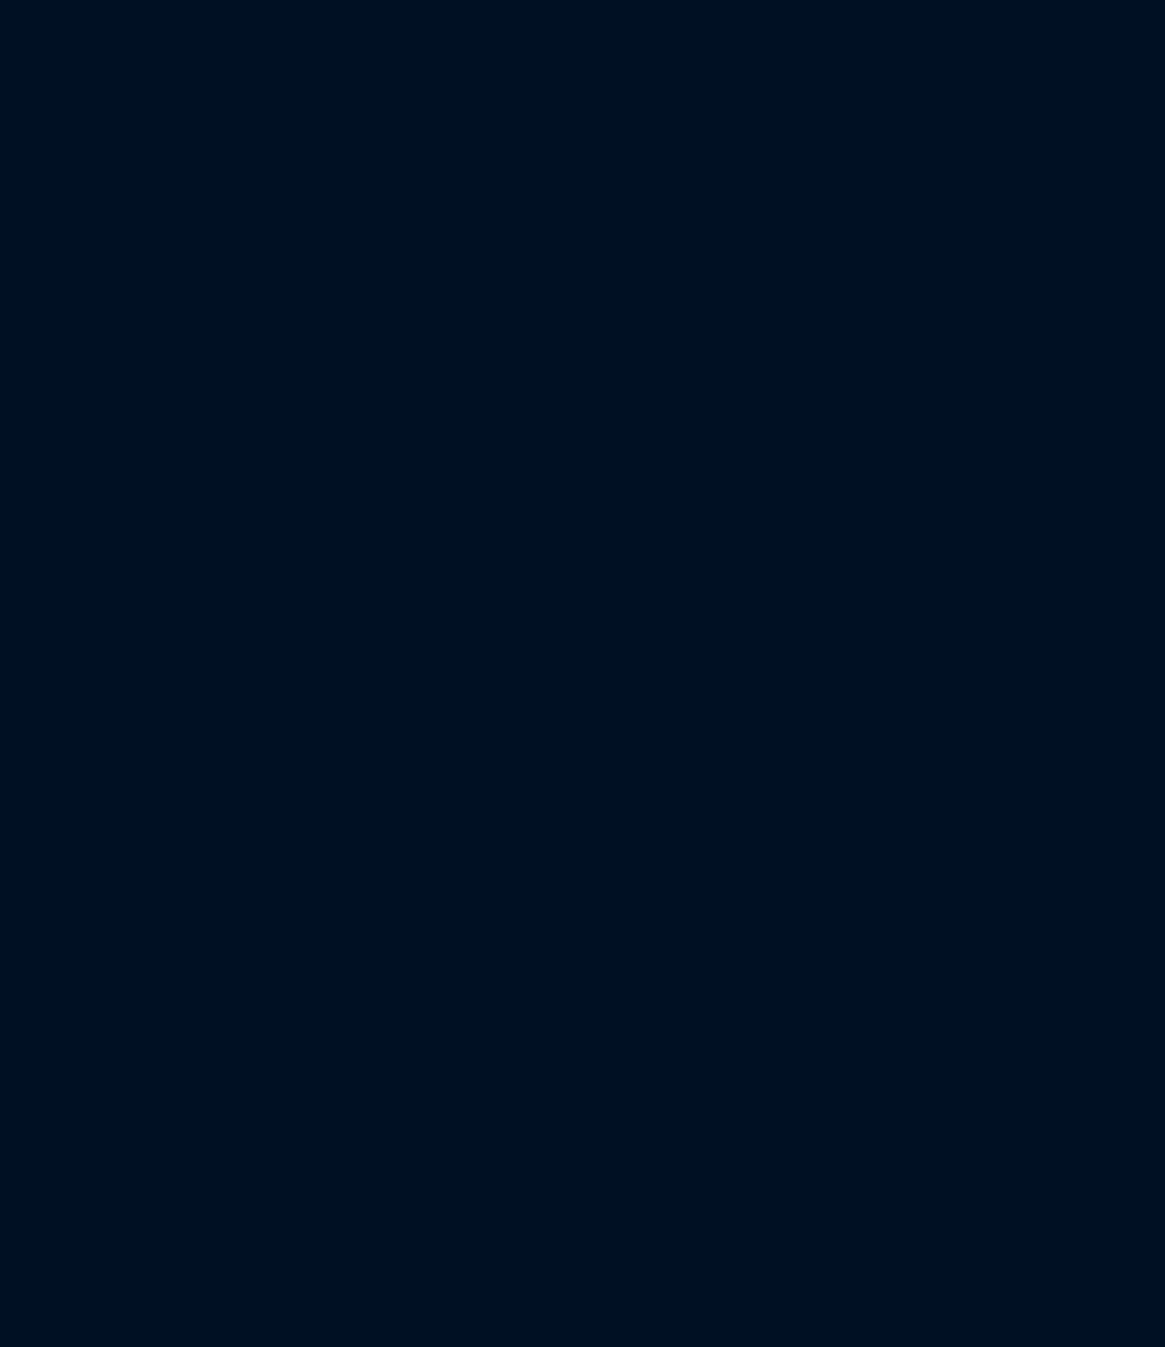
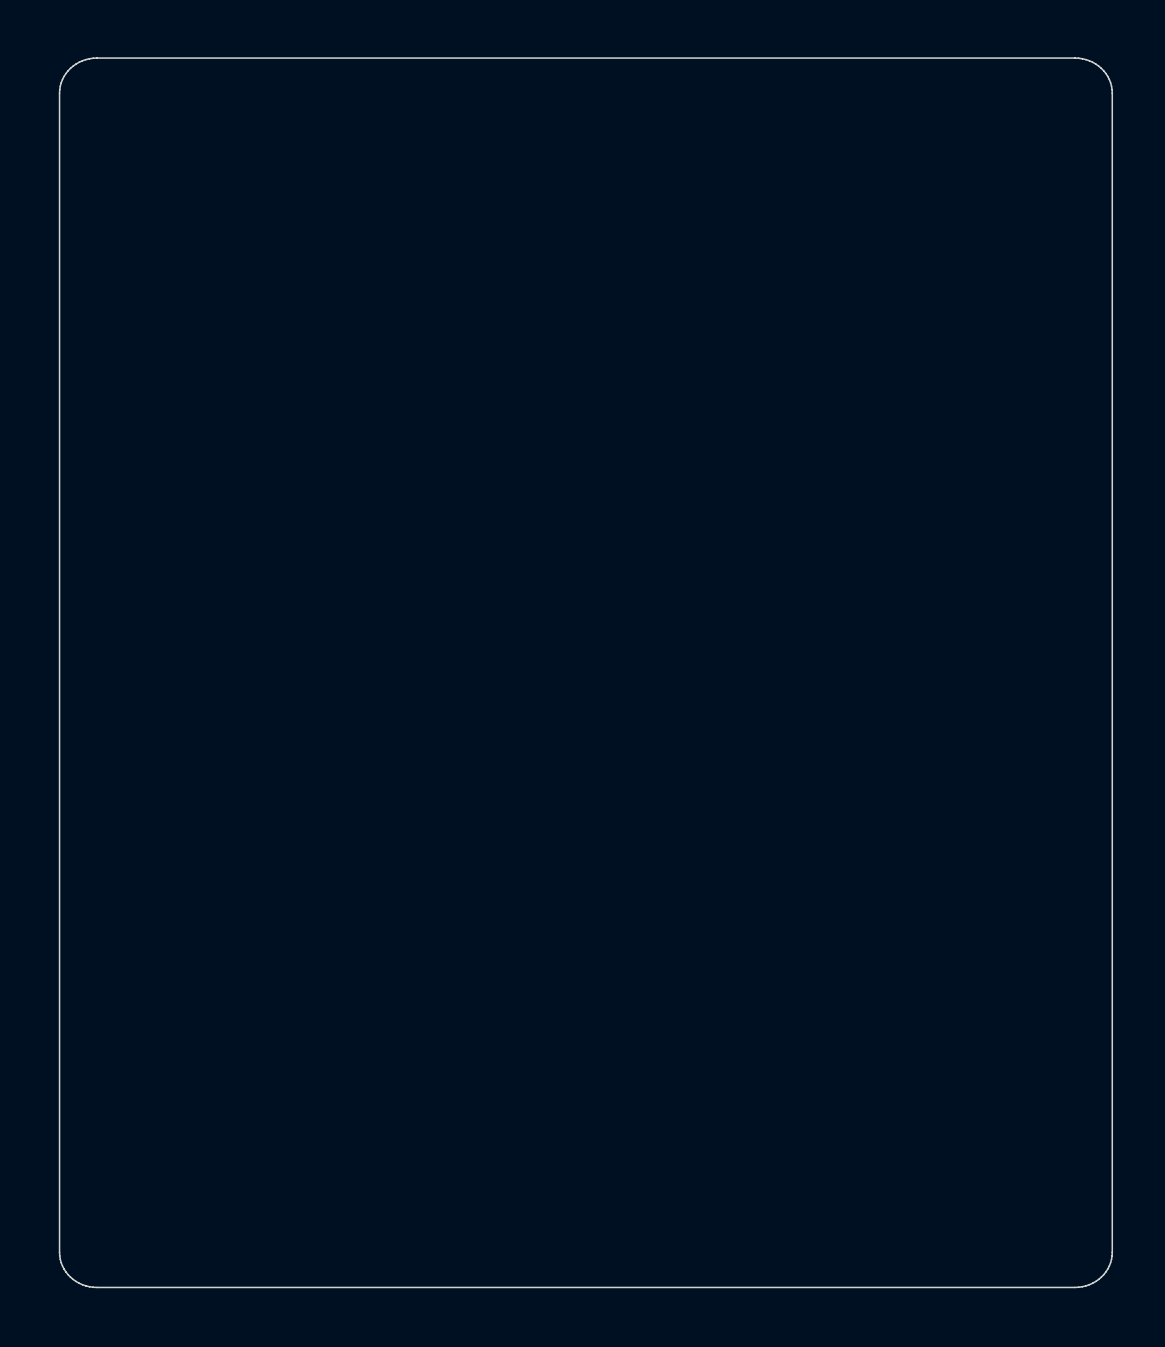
board edge: none -> (1074, 58) (97, 58) (82, 60) (68, 70) (61, 82) (59, 93) (59, 1252) (62, 1266) (73, 1279) (85, 1285) (97, 1287) (1074, 1287) (1089, 1284) (1103, 1274) (1110, 1262) (1112, 1252) (1112, 93) (1109, 79) (1101, 68) (1089, 60) (1074, 58)

